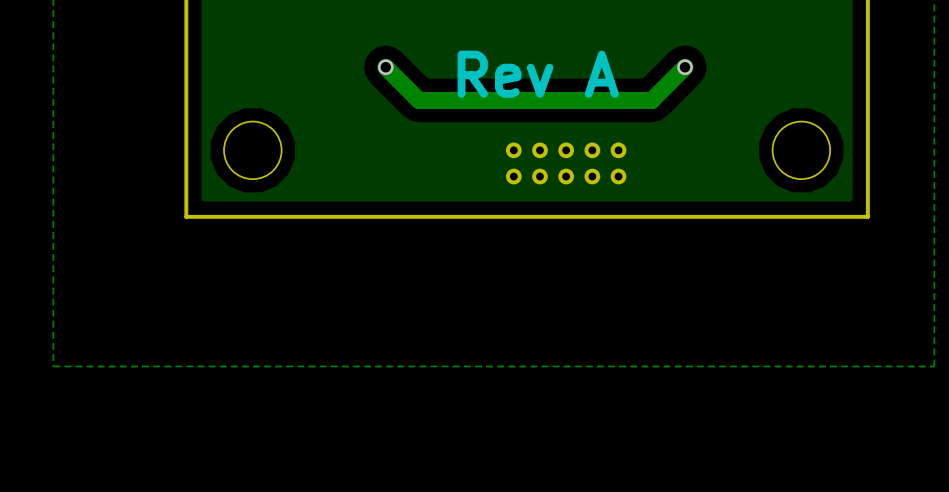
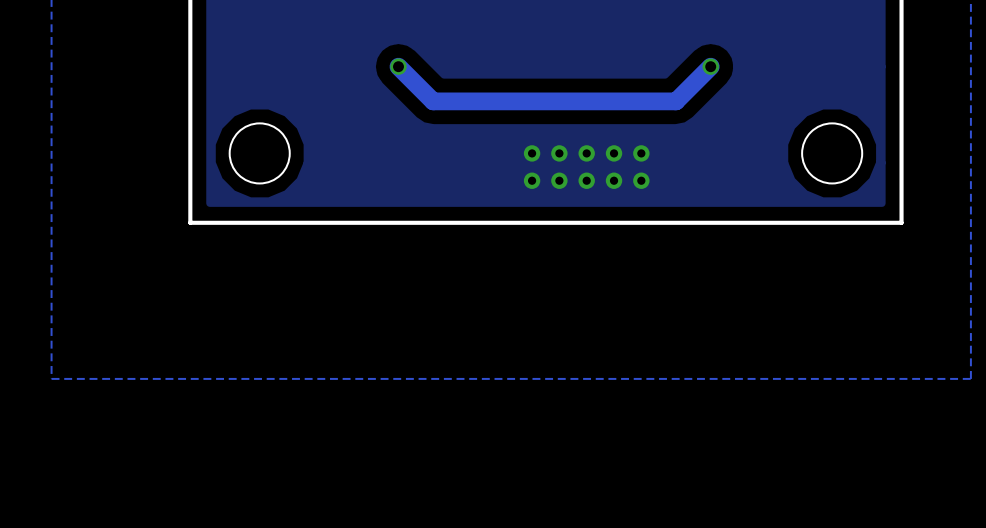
text: Rev A (538, 74) -> none

